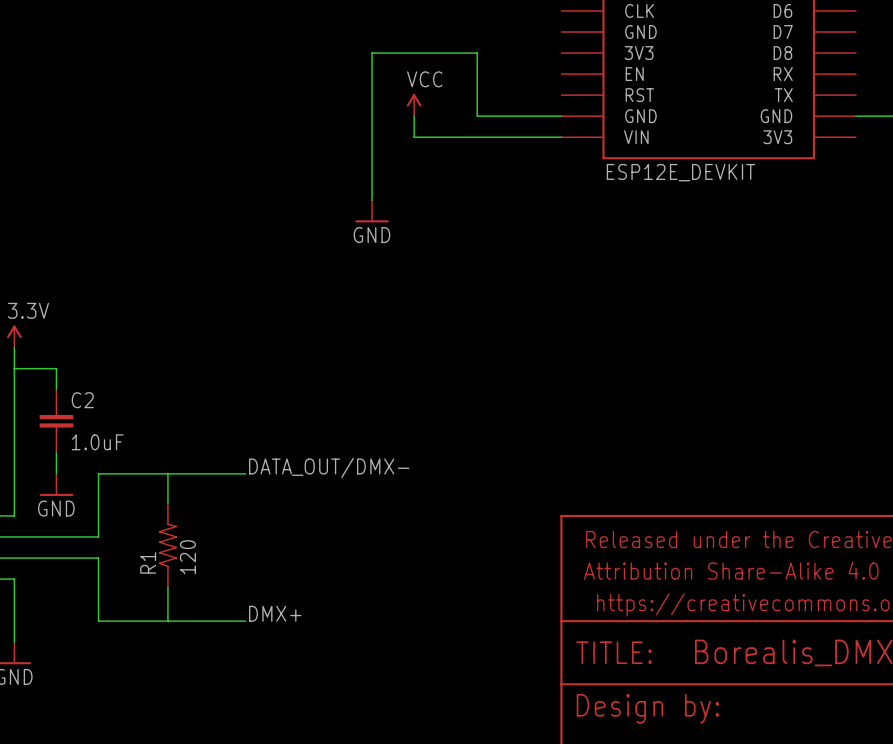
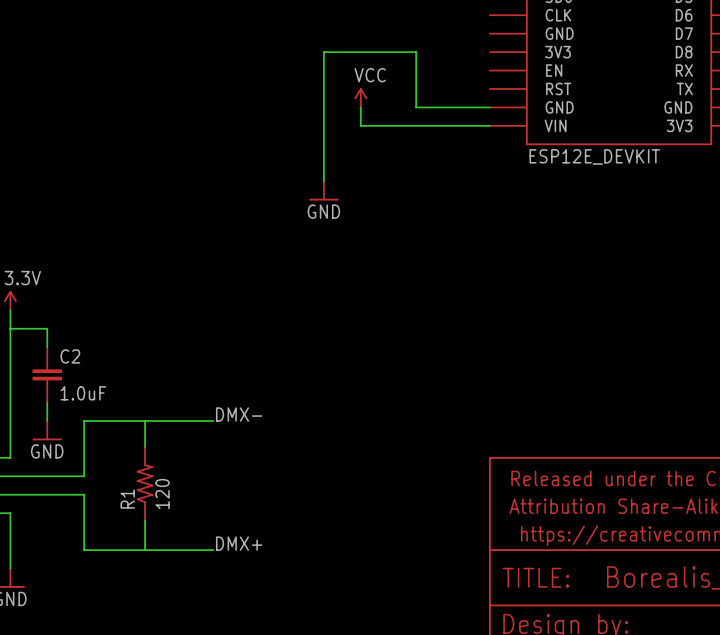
label: DATA_OUT/DMX- (329, 467) -> DMX- (239, 414)

